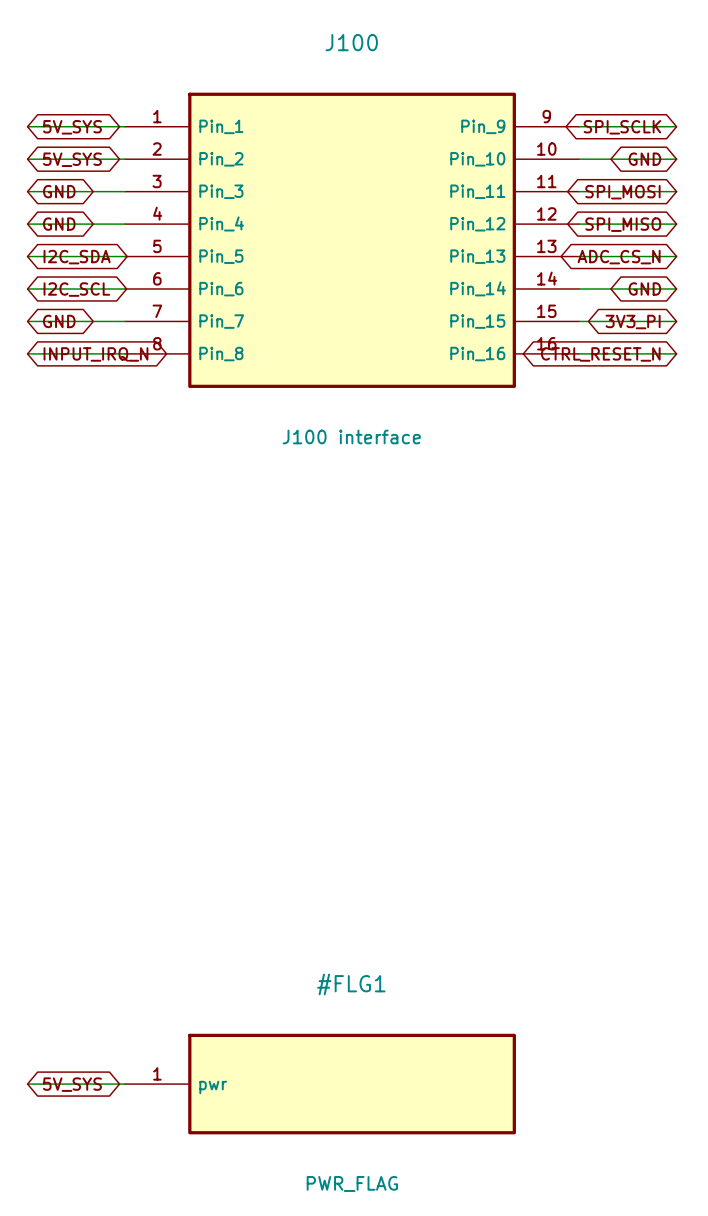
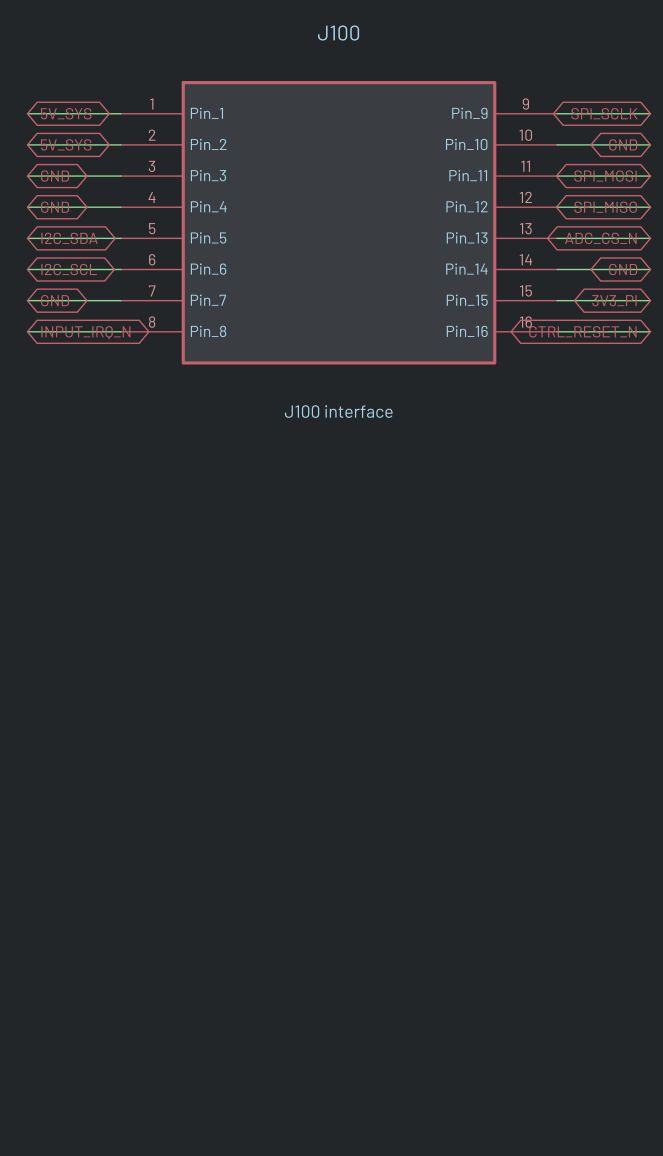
wire: (27, 1084) (124, 1084) -> none
global label: 5V_SYS (72, 1084) -> none
#FLG1: PWR_FLAG (320, 1084) -> none

